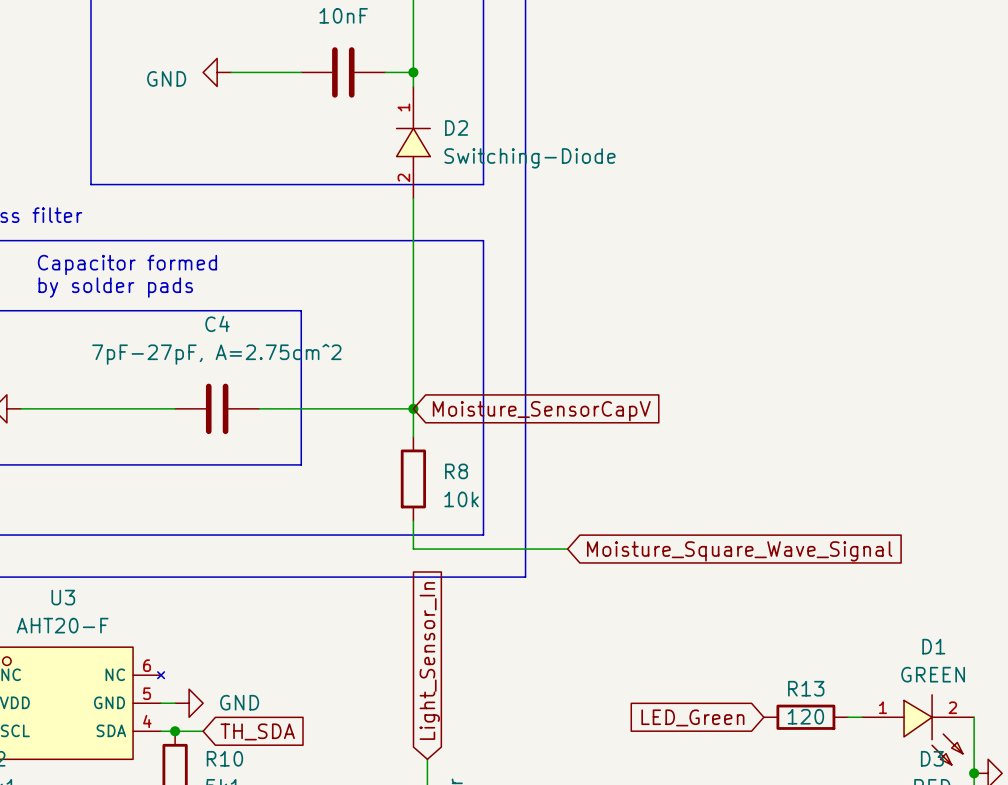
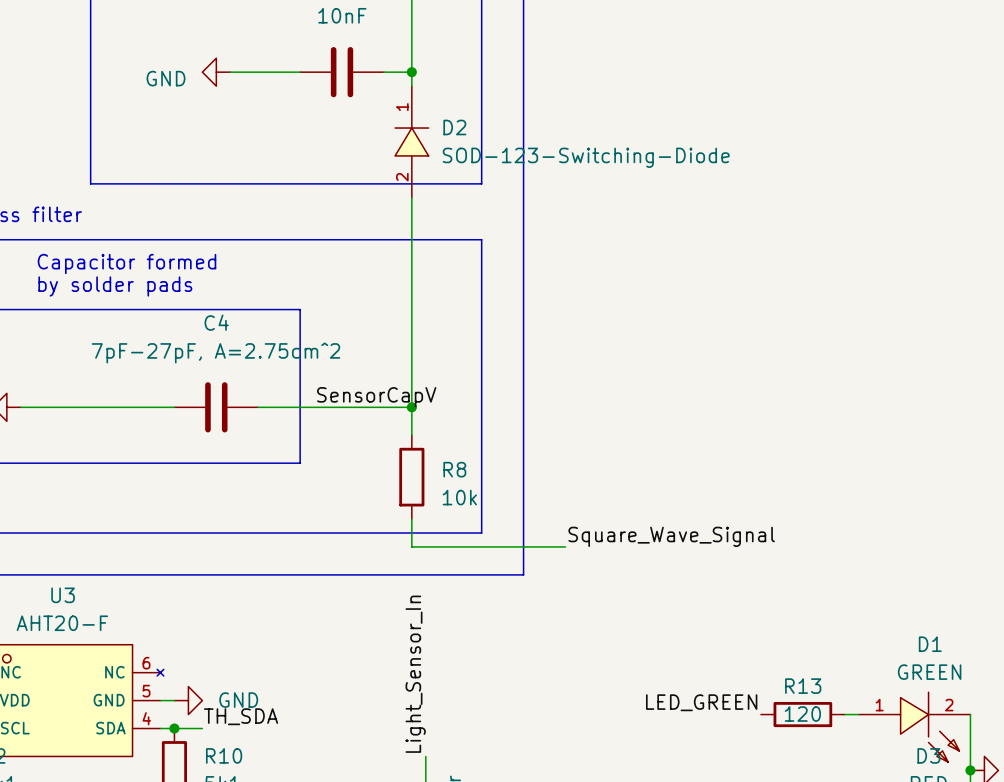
D2 value: Switching-Diode (529, 158) -> SOD-123-Switching-Diode (586, 157)
label: none -> SensorCapV (376, 397)
global label: Moisture_SensorCapV (541, 411) -> none
label: none -> Square_Wave_Signal (671, 536)
global label: Moisture_Square_Wave_Signal (739, 551) -> none
global label: Light_Sensor_In (429, 660) -> none
label: none -> Light_Sensor_In (415, 674)
label: none -> LED_GREEN (701, 702)
global label: LED_Green (692, 717) -> none
label: none -> TH_SDA (241, 716)
global label: TH_SDA (257, 731) -> none

